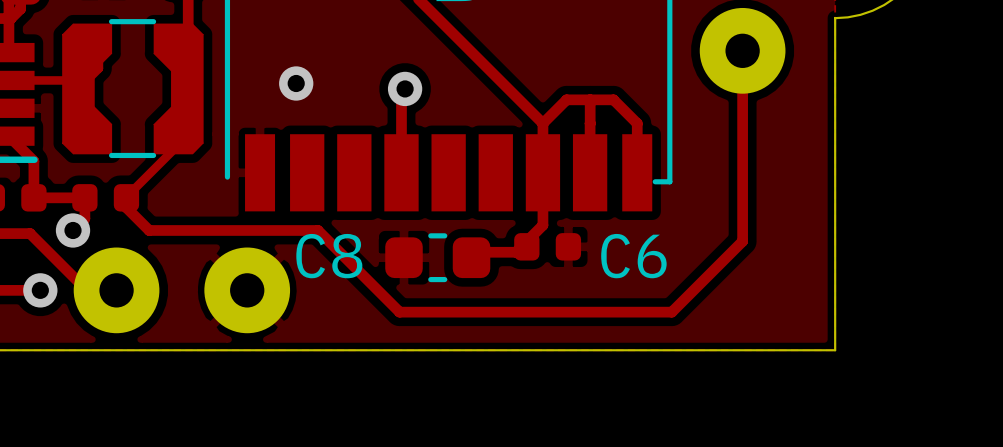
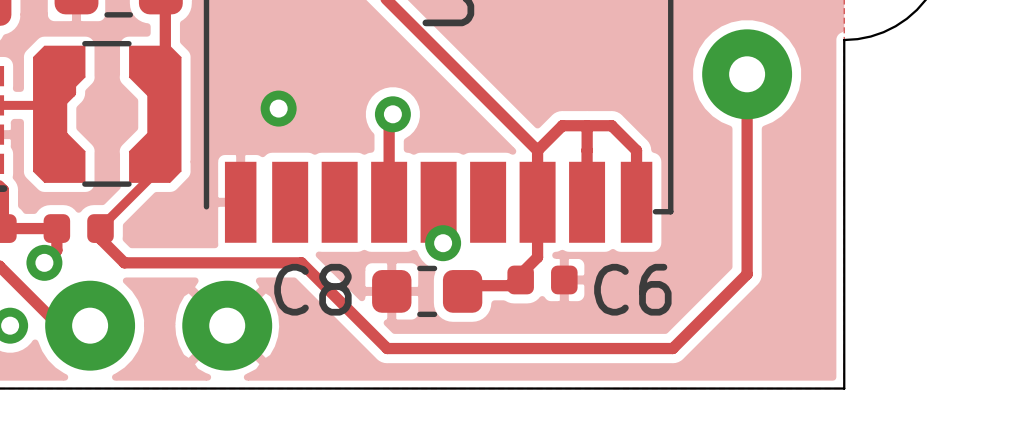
via: none -> (443, 243)

